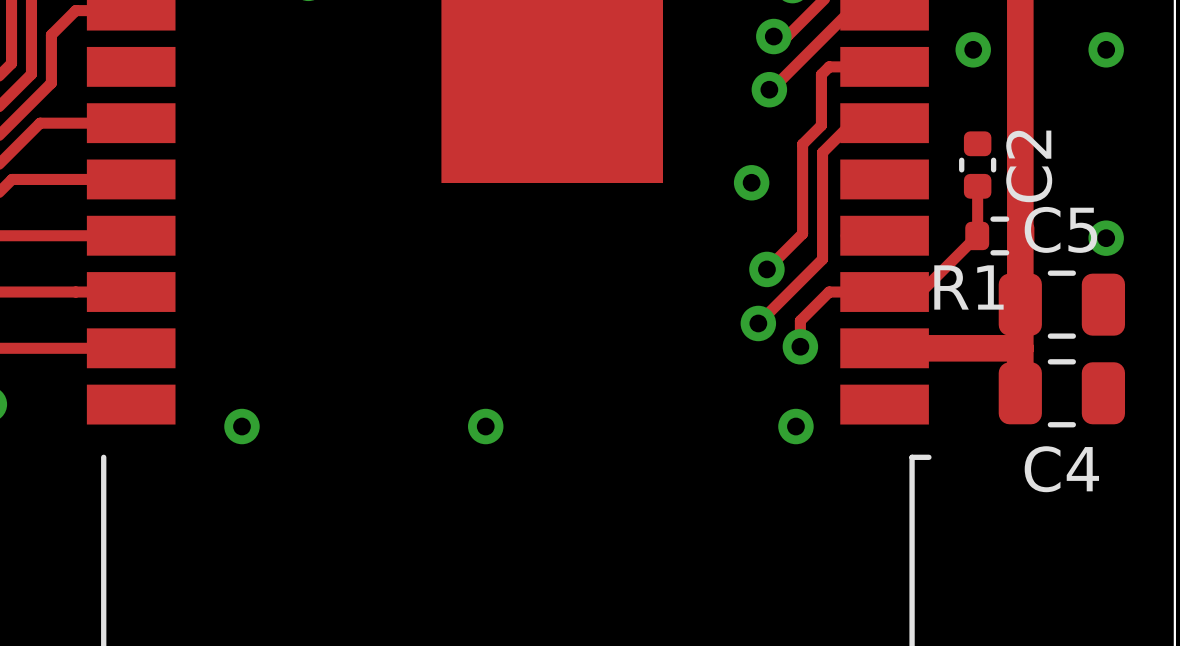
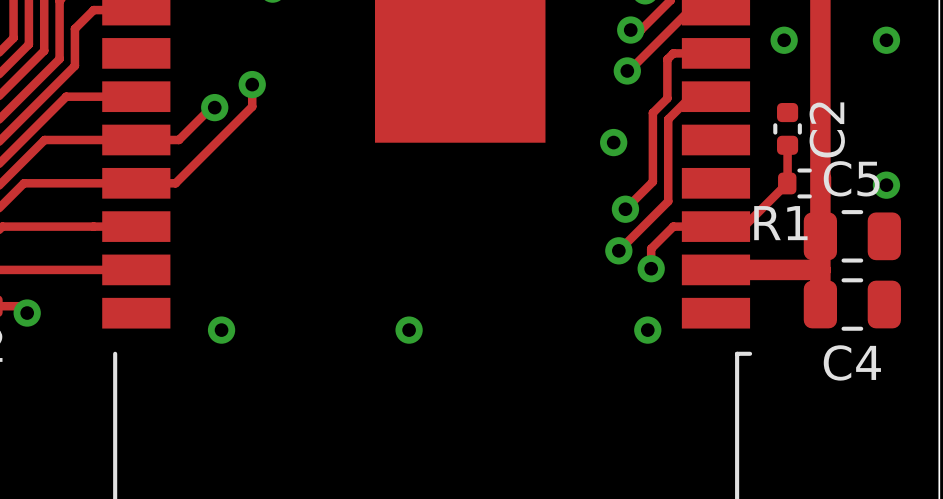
track: none -> (252, 84) (252, 106) (175, 183) (136, 183)
via: none -> (252, 84)
track: none -> (214, 107) (211, 107) (178, 139) (136, 139)
via: none -> (214, 107)

